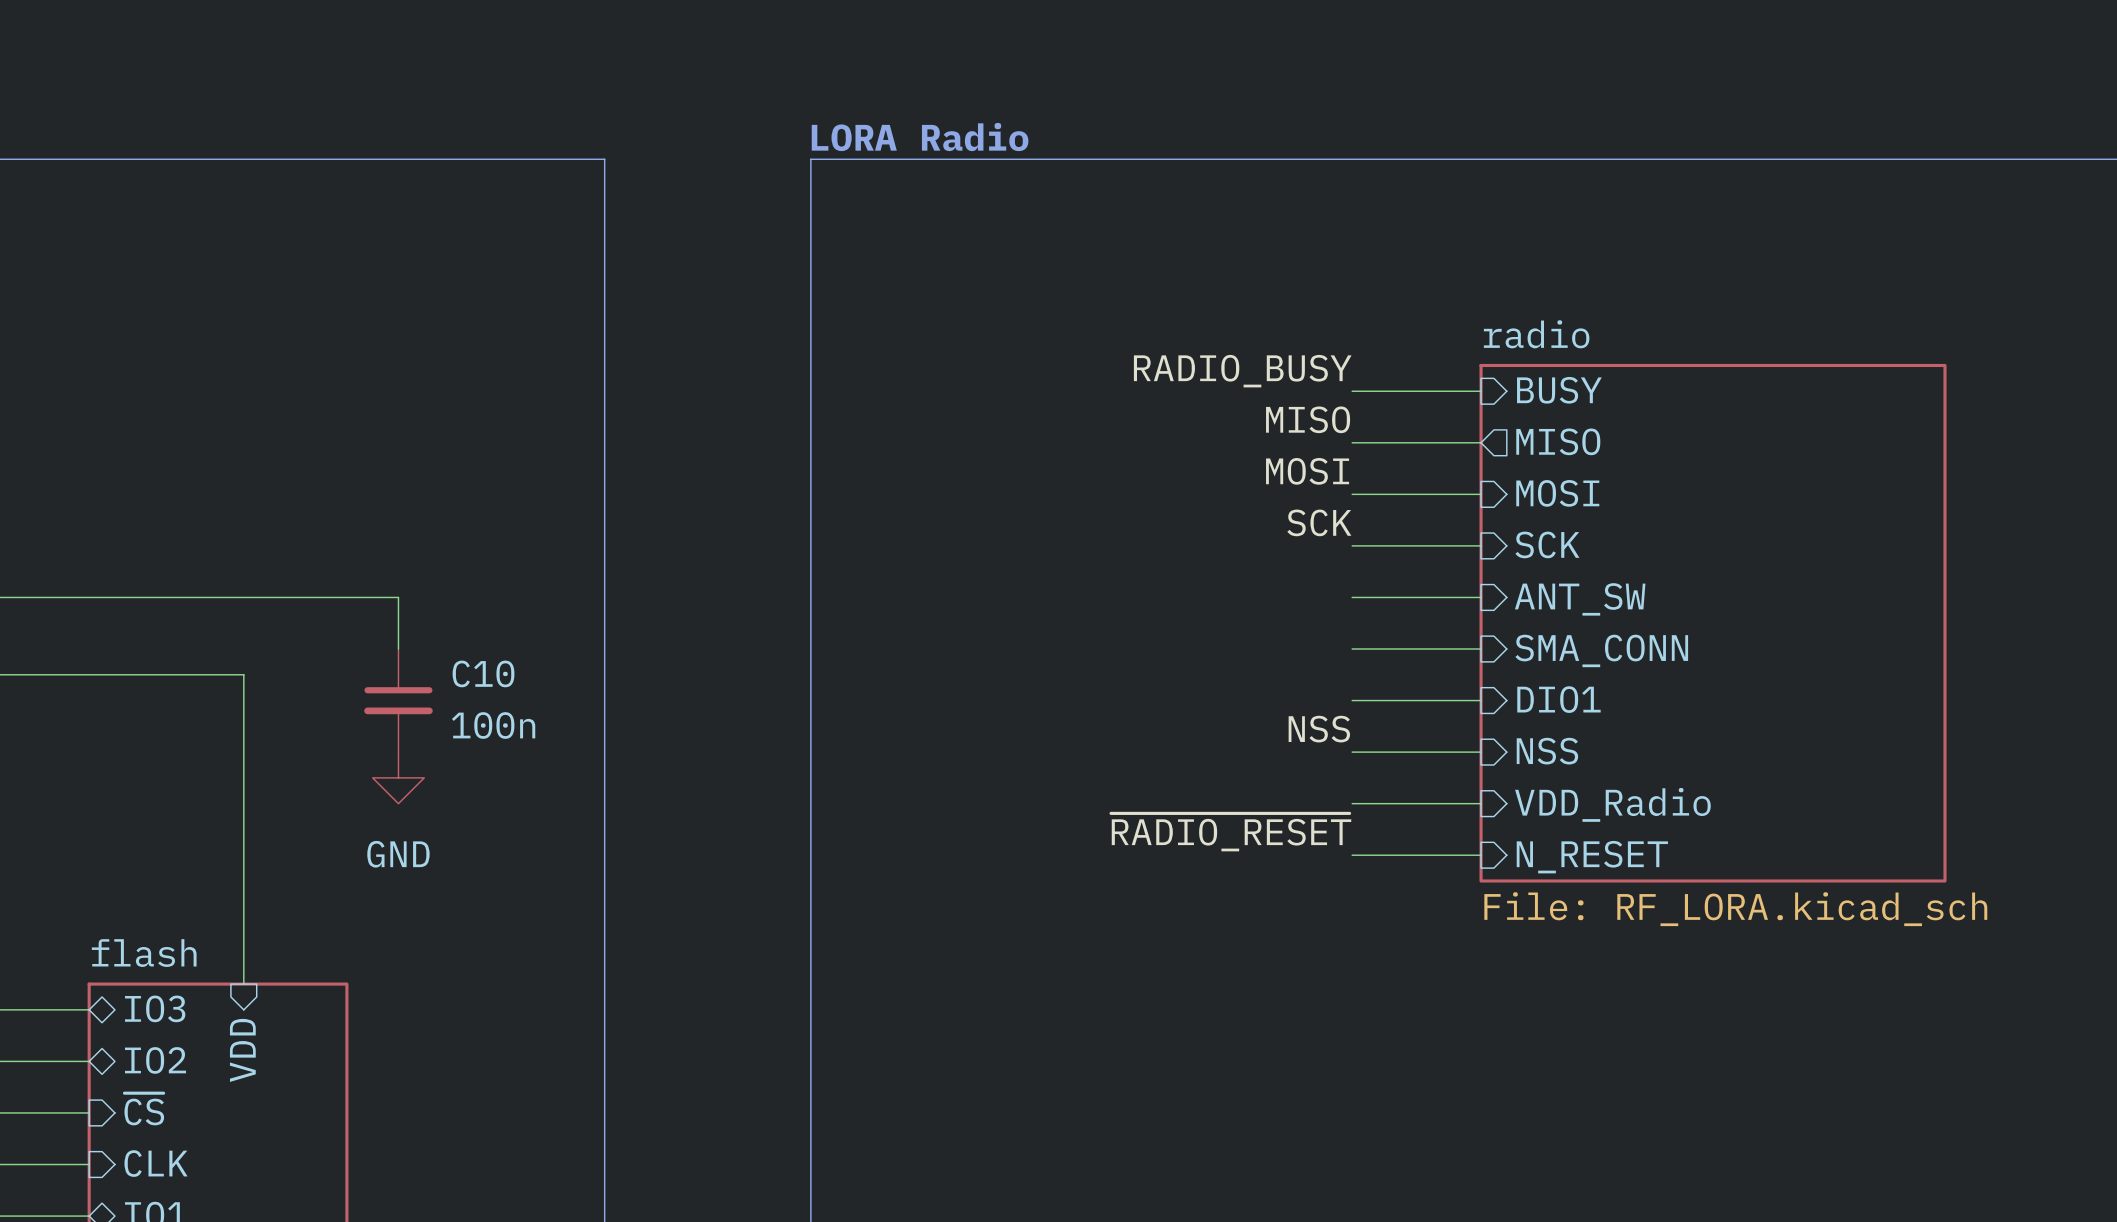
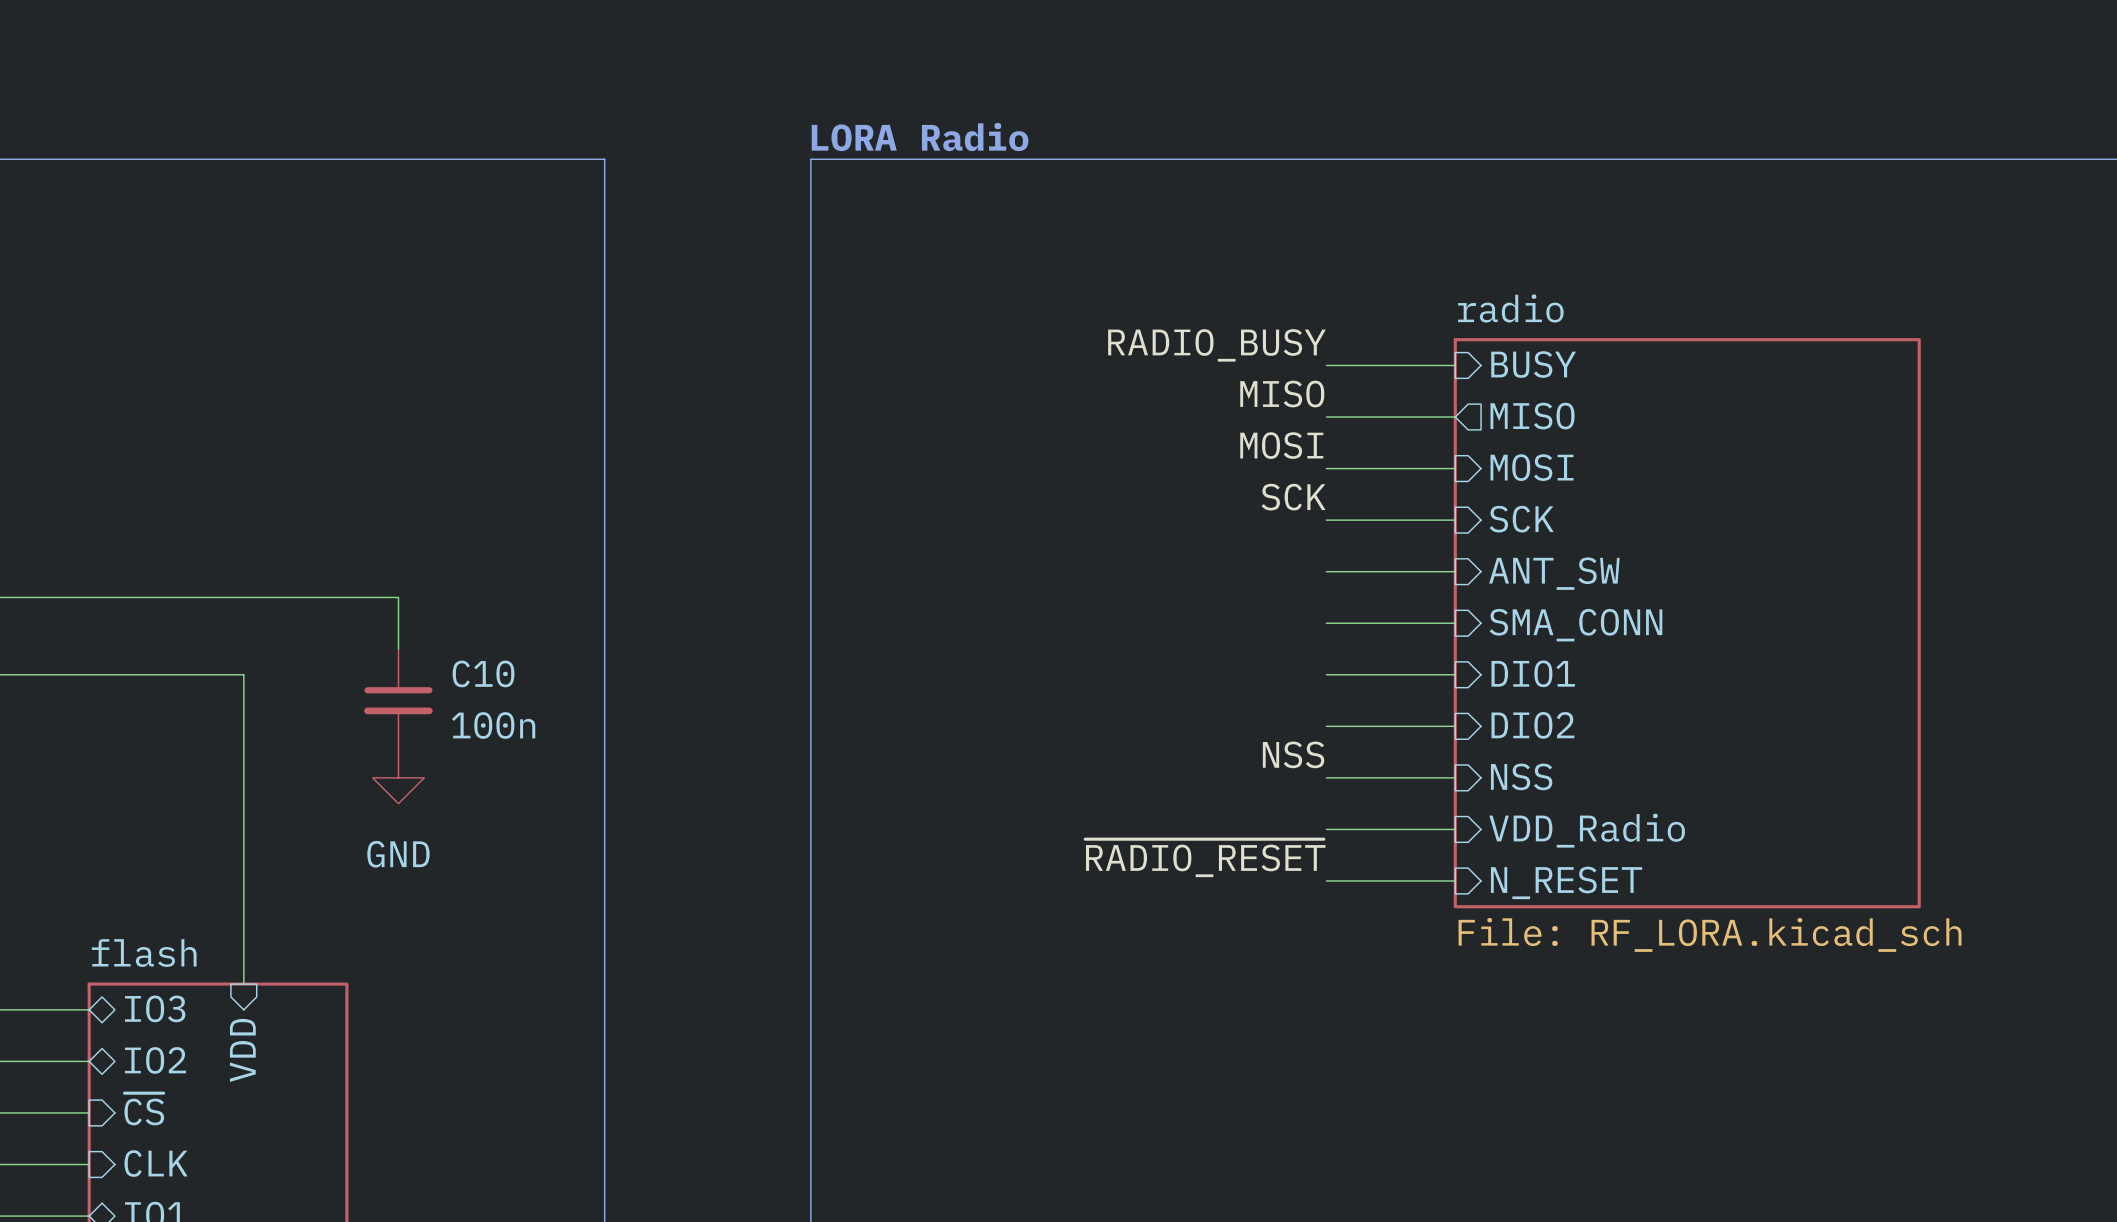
label position: RADIO_BUSY (1242, 371) -> RADIO_BUSY (1216, 345)
sheet pin position: BUSY (1559, 390) -> BUSY (1533, 364)
wire: (1352, 391) (1481, 391) -> (1326, 365) (1455, 365)
label position: MISO (1308, 419) -> MISO (1282, 394)
sheet pin position: MISO (1558, 441) -> MISO (1532, 416)
wire: (1352, 442) (1481, 442) -> (1326, 417) (1455, 417)
label position: MOSI (1307, 471) -> MOSI (1281, 445)
sheet pin position: MOSI (1557, 493) -> MOSI (1532, 467)
wire: (1352, 494) (1481, 494) -> (1326, 468) (1455, 468)
label position: SCK (1319, 522) -> SCK (1293, 497)
sheet pin position: SCK (1547, 544) -> SCK (1521, 519)
wire: (1352, 545) (1481, 545) -> (1326, 520) (1455, 520)
wire: none -> (1326, 571) (1455, 571)
wire: (1352, 597) (1481, 597) -> (1326, 623) (1455, 623)
sheet pin position: ANT_SW (1580, 599) -> ANT_SW (1554, 573)
sheet radio: none -> File: RF_LORA.kicad_sch (1687, 623)
sheet radio: File: RF_LORA.kicad_sch (1713, 623) -> none
wire: (1352, 649) (1481, 649) -> (1326, 674) (1455, 674)
sheet pin position: SMA_CONN (1601, 650) -> SMA_CONN (1575, 625)
sheet pin position: DIO1 (1558, 699) -> DIO1 (1533, 673)
wire: (1352, 700) (1481, 700) -> (1326, 726) (1455, 726)
sheet pin: none -> DIO2 (1532, 725)
label position: NSS (1319, 729) -> NSS (1293, 754)
sheet pin position: NSS (1547, 751) -> NSS (1521, 776)
wire: (1352, 752) (1481, 752) -> (1326, 777) (1455, 777)
wire: (1352, 803) (1481, 803) -> (1326, 829) (1455, 829)
sheet pin position: VDD_Radio (1612, 804) -> VDD_Radio (1587, 830)
label position: ~{RADIO_RESET} (1231, 832) -> ~{RADIO_RESET} (1205, 858)
wire: (1352, 855) (1481, 855) -> (1326, 880) (1455, 880)
sheet pin position: N_RESET (1592, 857) -> N_RESET (1566, 882)

